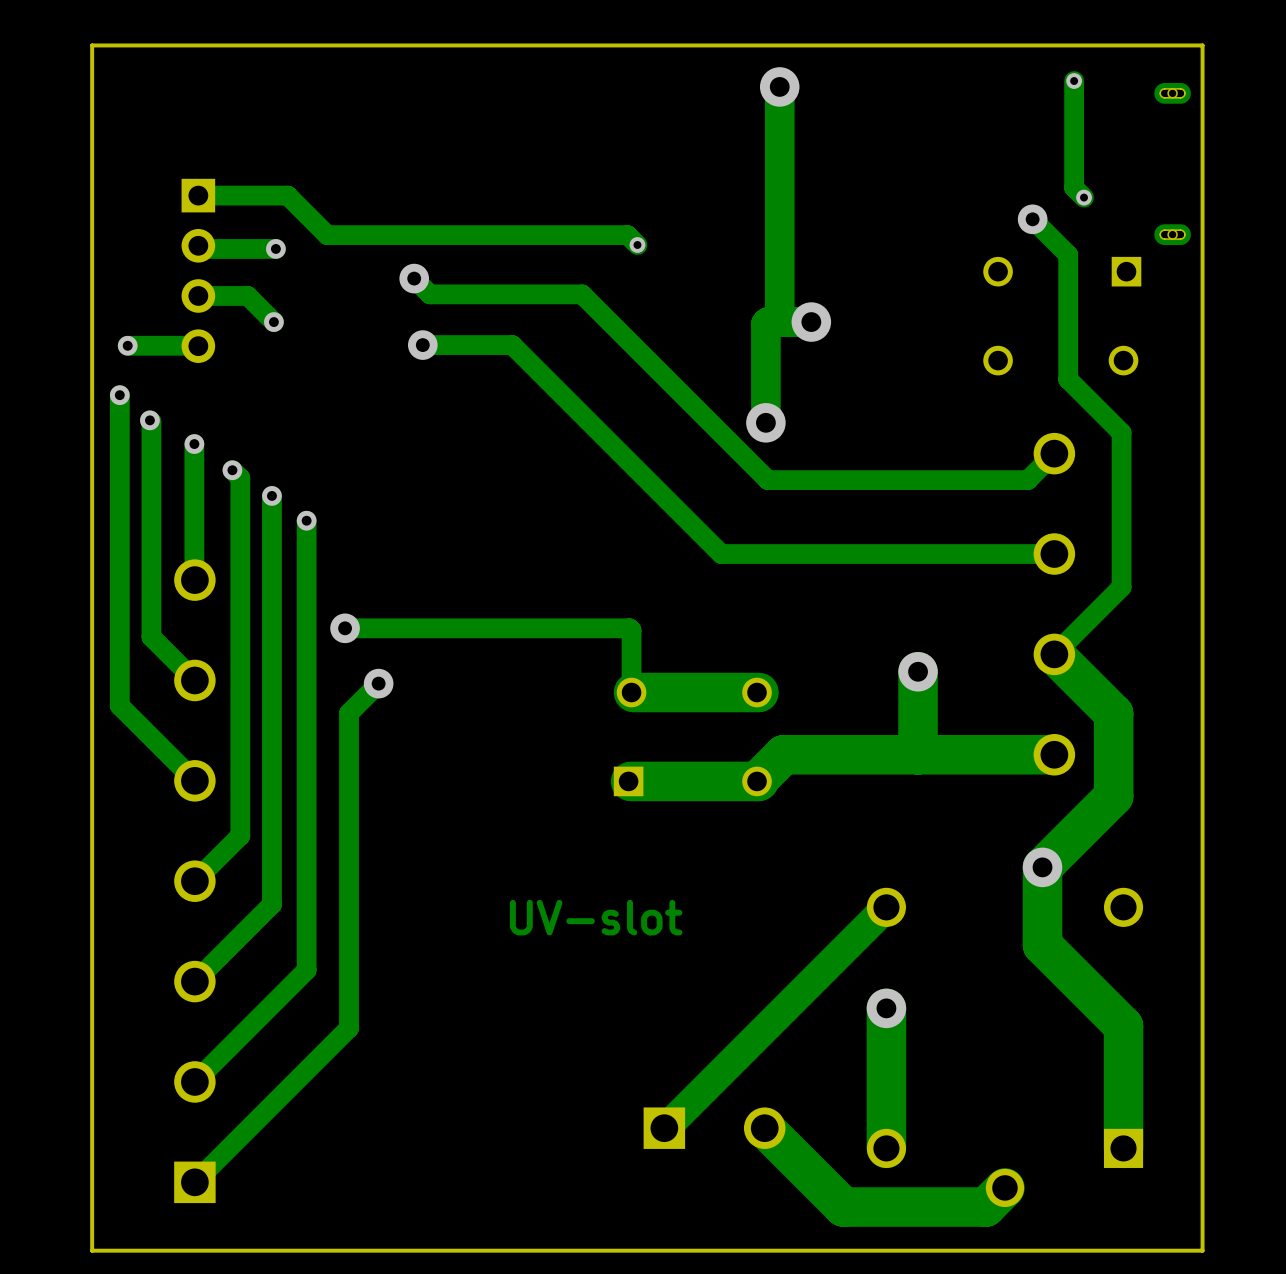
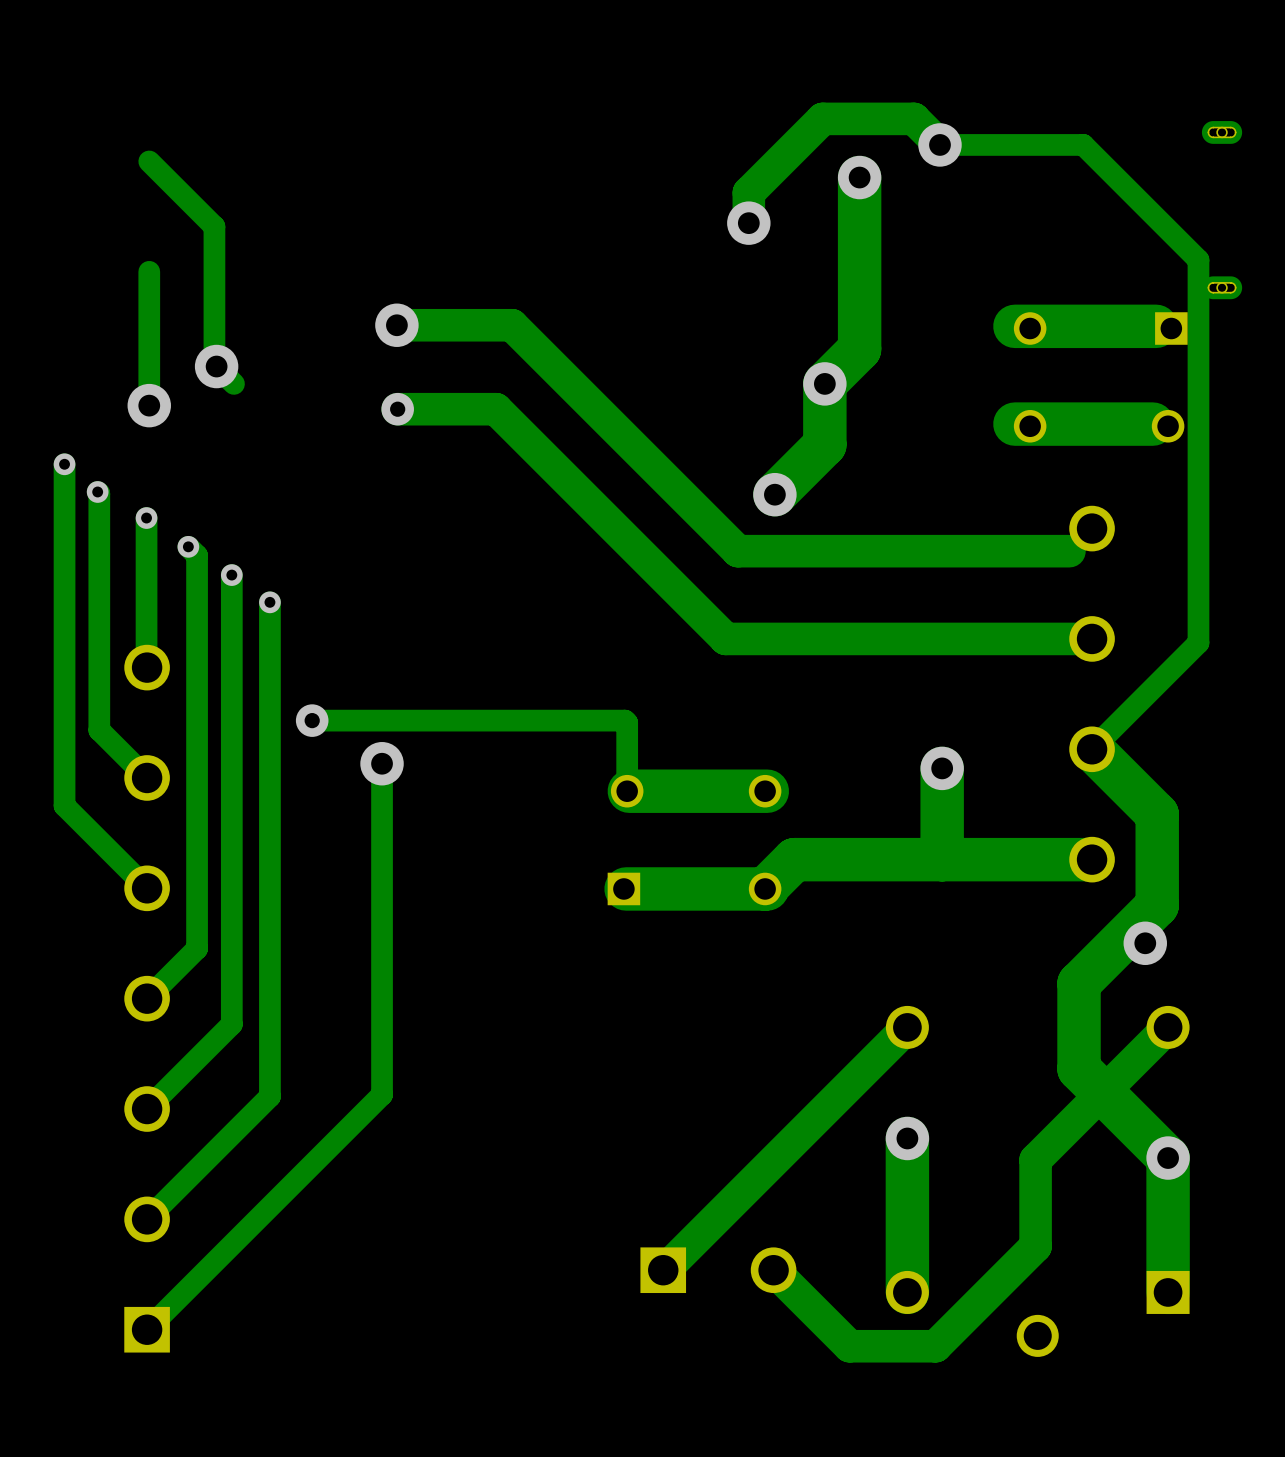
board edge: (1202, 45) (92, 45) (92, 1250) (1202, 1250) (1202, 45) -> none
track: (1074, 81) (1074, 187) (1084, 197) -> none
via: (1074, 81) -> none
track: (779, 86) (779, 318) (777, 320) (779, 322) -> none
via: (779, 86) -> none
via: none -> (939, 144)
via: none -> (859, 177)
via: none -> (748, 223)
track: (198, 195) (287, 195) (327, 235) (627, 235) (637, 245) -> none
via: (1084, 197) -> none
track: (1032, 219) (1068, 254) (1068, 379) (1121, 432) (1121, 587) -> (748, 223) (748, 192) (822, 118) (913, 118) (939, 144) (1083, 144) (1198, 260) (1198, 642) (1165, 675)
via: (1032, 219) -> none
track: none -> (149, 271) (149, 405)
track: (198, 245) (201, 248) (275, 248) -> none
via: (637, 245) -> none
via: (275, 248) -> none
via size: [399, 263, 430, 294] -> [375, 303, 419, 347]
track: none -> (1156, 326) (1014, 326)
part: (198, 270) -> none
track: (414, 278) (430, 294) (582, 294) (767, 480) (1027, 480) (1033, 474) -> (396, 325) (512, 325) (737, 551) (1069, 551)
track: (198, 295) (247, 295) (256, 304) -> (149, 161) (214, 226) (214, 364)
via: none -> (216, 366)
via: (273, 322) -> none
track: (811, 322) (767, 322) (765, 324) (765, 422) -> (859, 177) (859, 349) (824, 383) (824, 444) (774, 494)
via: none -> (149, 405)
track: (127, 345) (198, 346) -> none
via: (127, 345) -> none
track width: thin (422, 345) (512, 345) (721, 554) (1054, 554) -> thick (397, 409) (496, 409) (725, 638) (1092, 638)
track: none -> (1152, 424) (1014, 424)
via: none -> (382, 763)
track: (378, 683) (349, 713) (349, 1028) -> (382, 763) (382, 1094) (316, 1160)
via: (378, 683) -> none
via position: (1042, 867) -> (1145, 943)
text: UV-slot (596, 917) -> none
via: none -> (1168, 1158)
track width: thick (764, 1128) (833, 1197) -> thin (773, 1270) (849, 1346)
track: (1004, 1187) (985, 1207) (843, 1207) (833, 1197) -> (1168, 1027) (1035, 1159) (1035, 1246) (935, 1346) (849, 1346)

